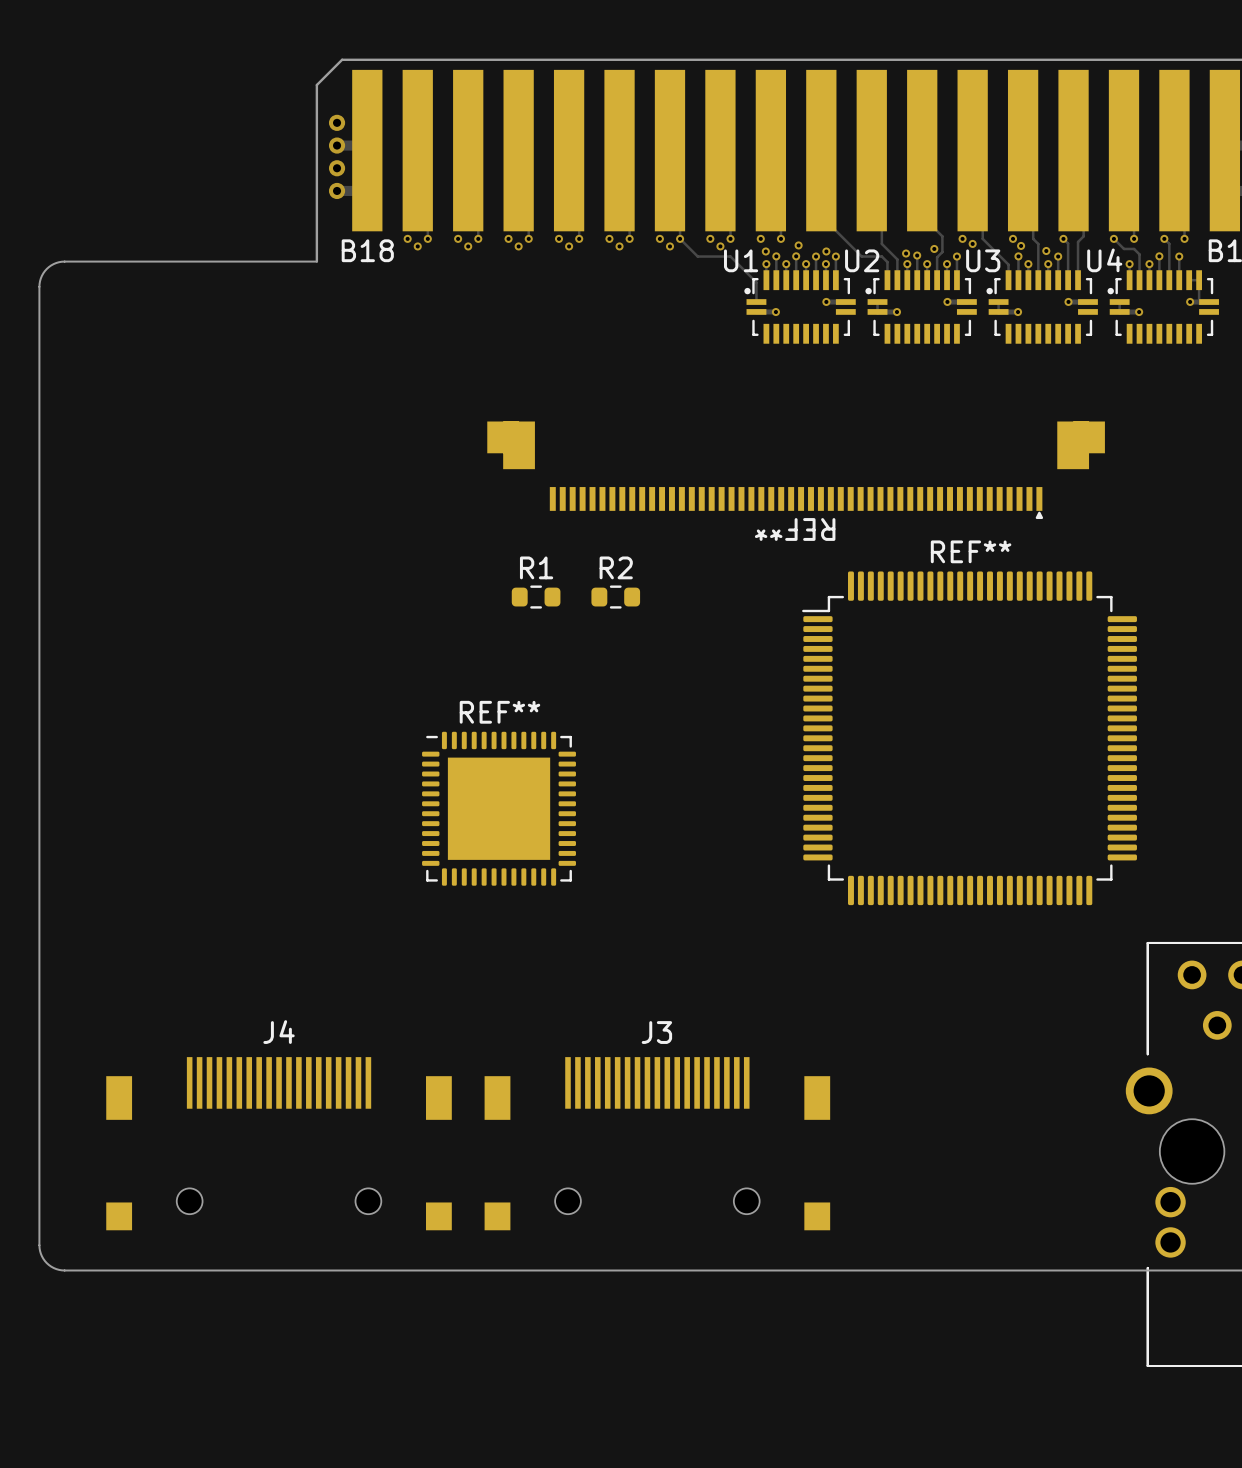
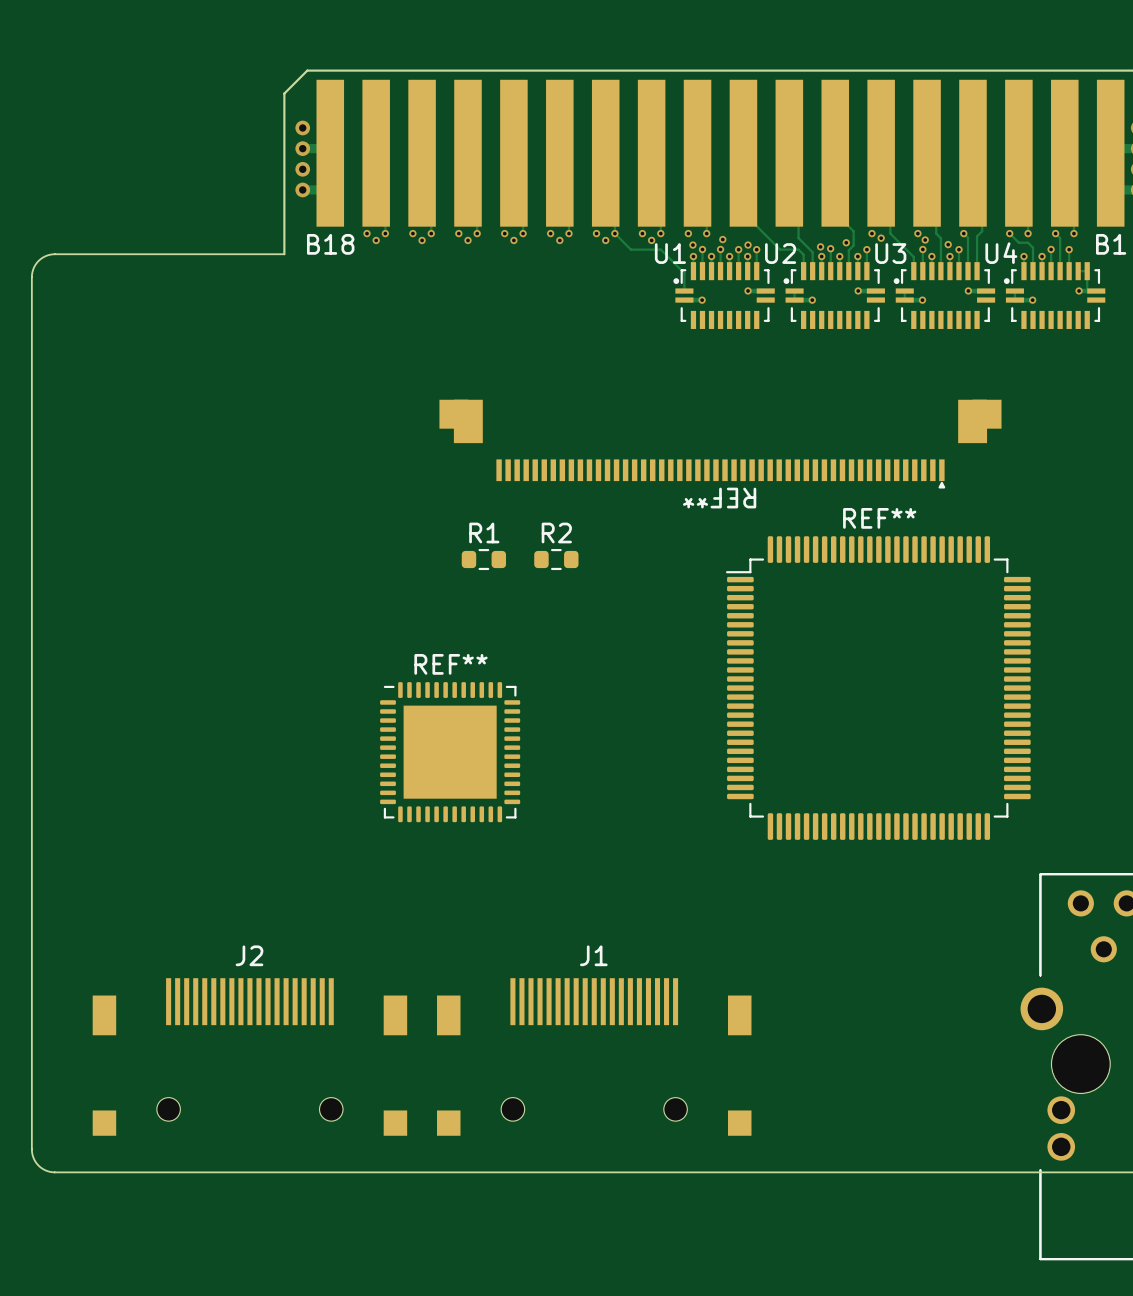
J4 name: J4 (279, 1032) -> J2 (249, 955)
J3 name: J3 (656, 1032) -> J1 (593, 955)

